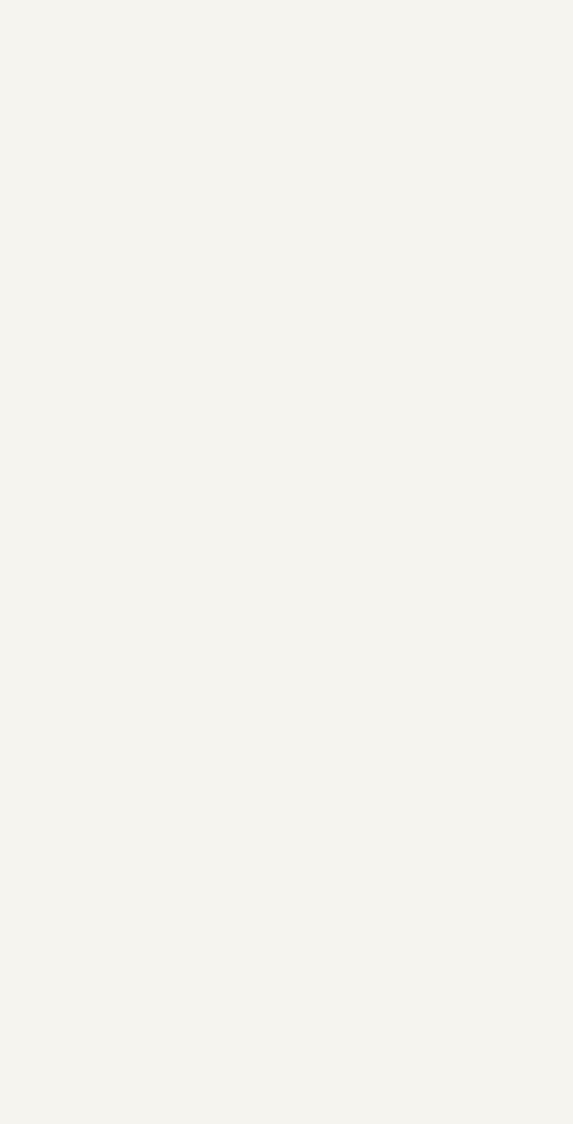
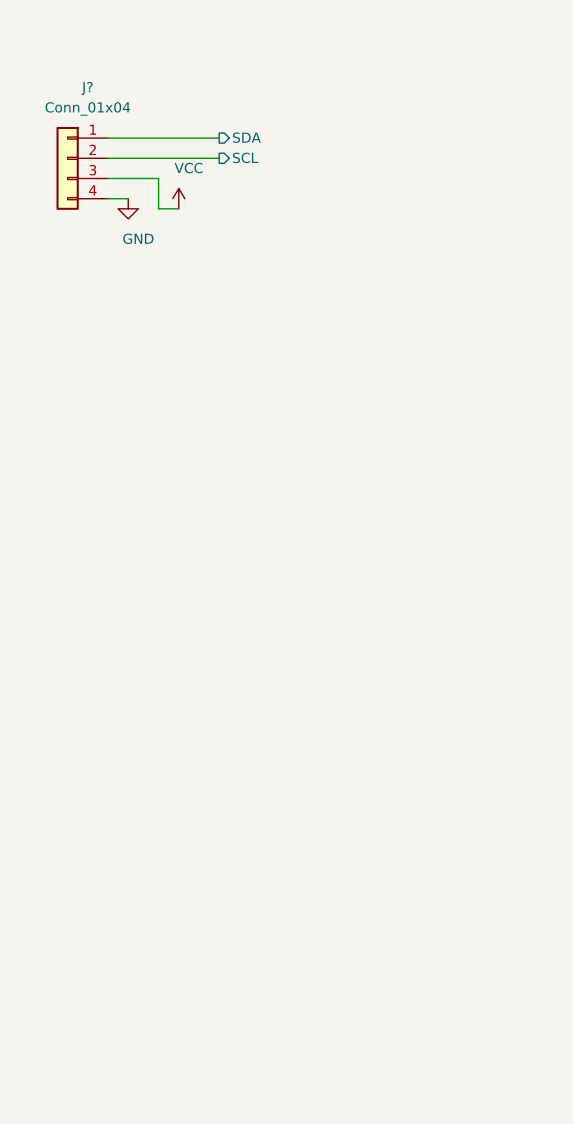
sheet pin: none -> SDA (246, 137)
wire: none -> (108, 138) (219, 138)
sheet pin: none -> SCL (245, 157)
wire: none -> (108, 158) (219, 158)
J?: none -> Conn_01x04 (82, 168)
wire: none -> (108, 178) (158, 178) (158, 208) (178, 208)
wire: none -> (108, 198) (128, 198)
power symbol: none -> VCC (178, 198)
power symbol: none -> GND (128, 208)

